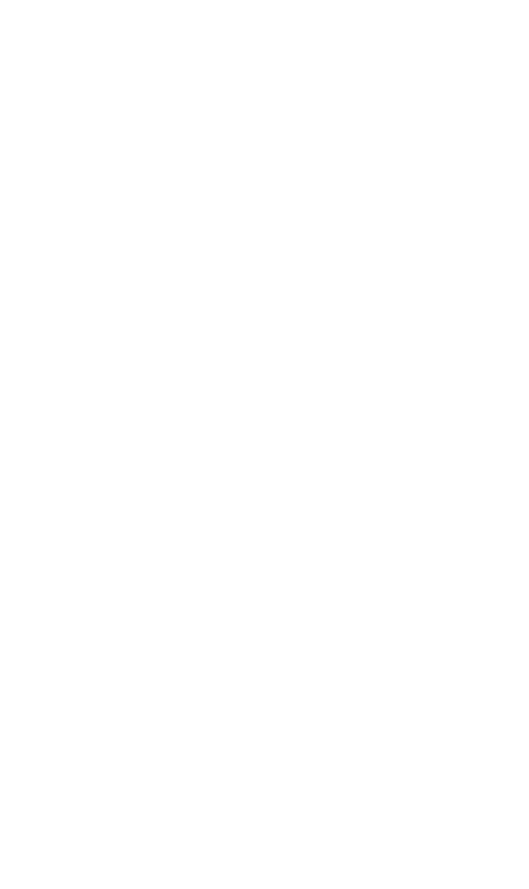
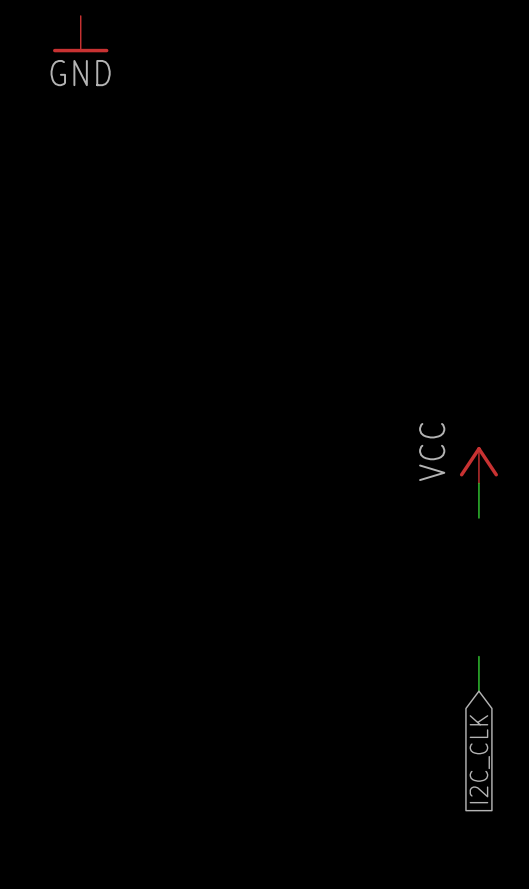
power symbol: none -> GND (80, 34)
power symbol: none -> VCC (478, 465)
wire: none -> (478, 483) (478, 518)
wire: none -> (478, 656) (478, 691)
global label: none -> I2C_CLK (479, 759)

